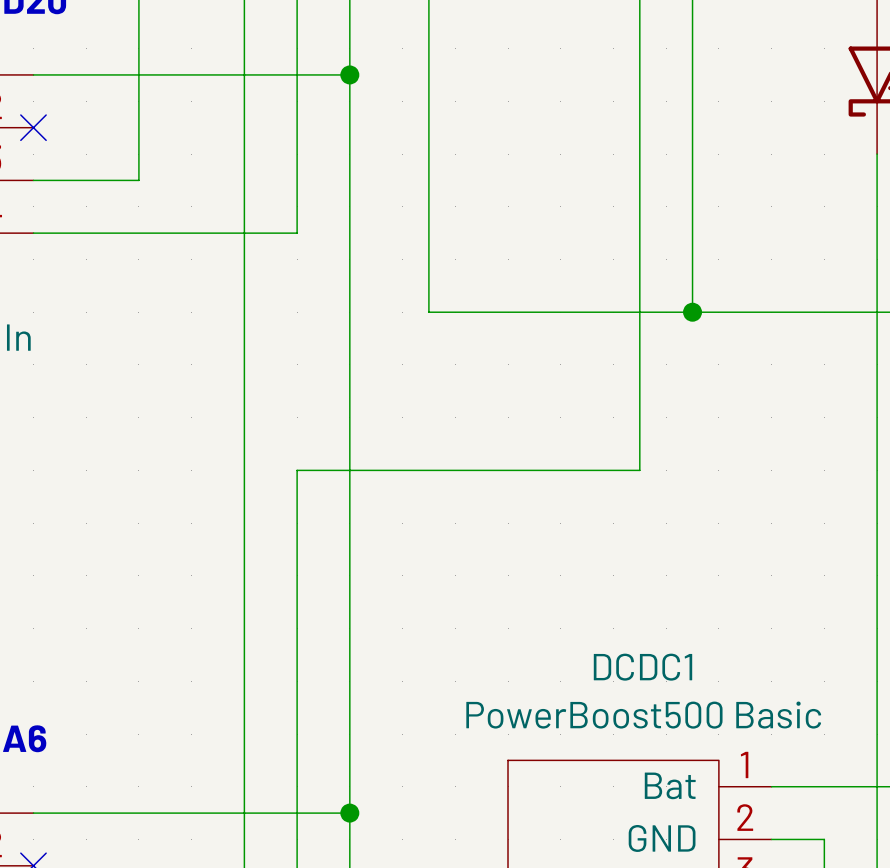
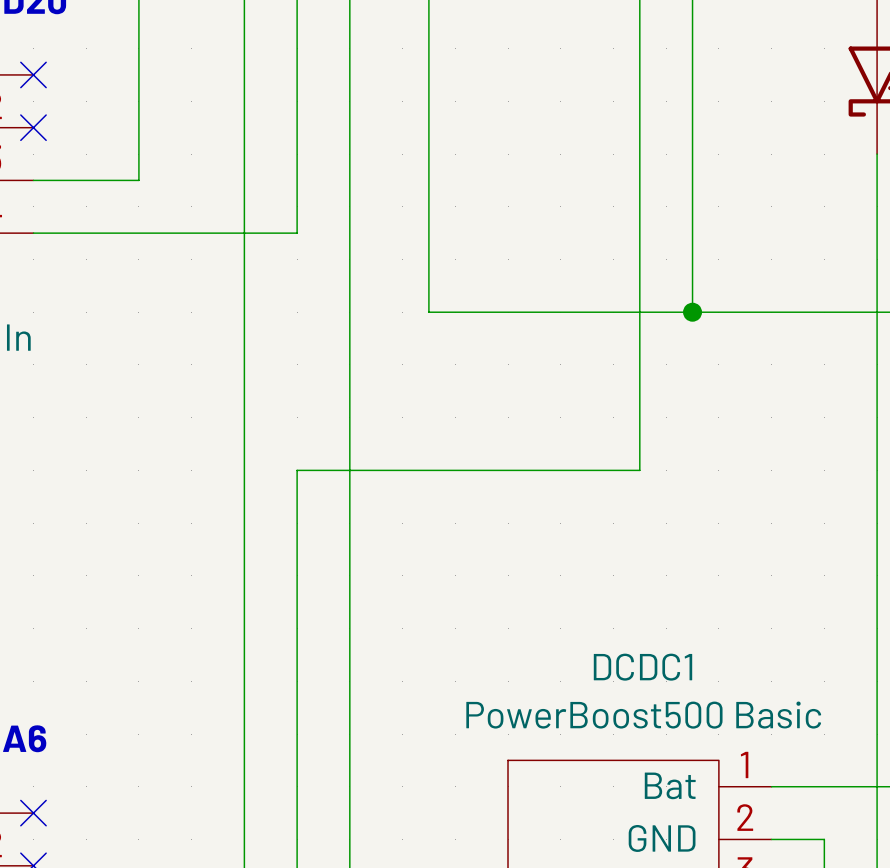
wire: (33, 74) (349, 74) -> none
no-connect mark: none -> (33, 74)
junction: (349, 74) -> none
wire: (33, 813) (349, 813) -> none
no-connect mark: none -> (33, 813)
junction: (349, 813) -> none

